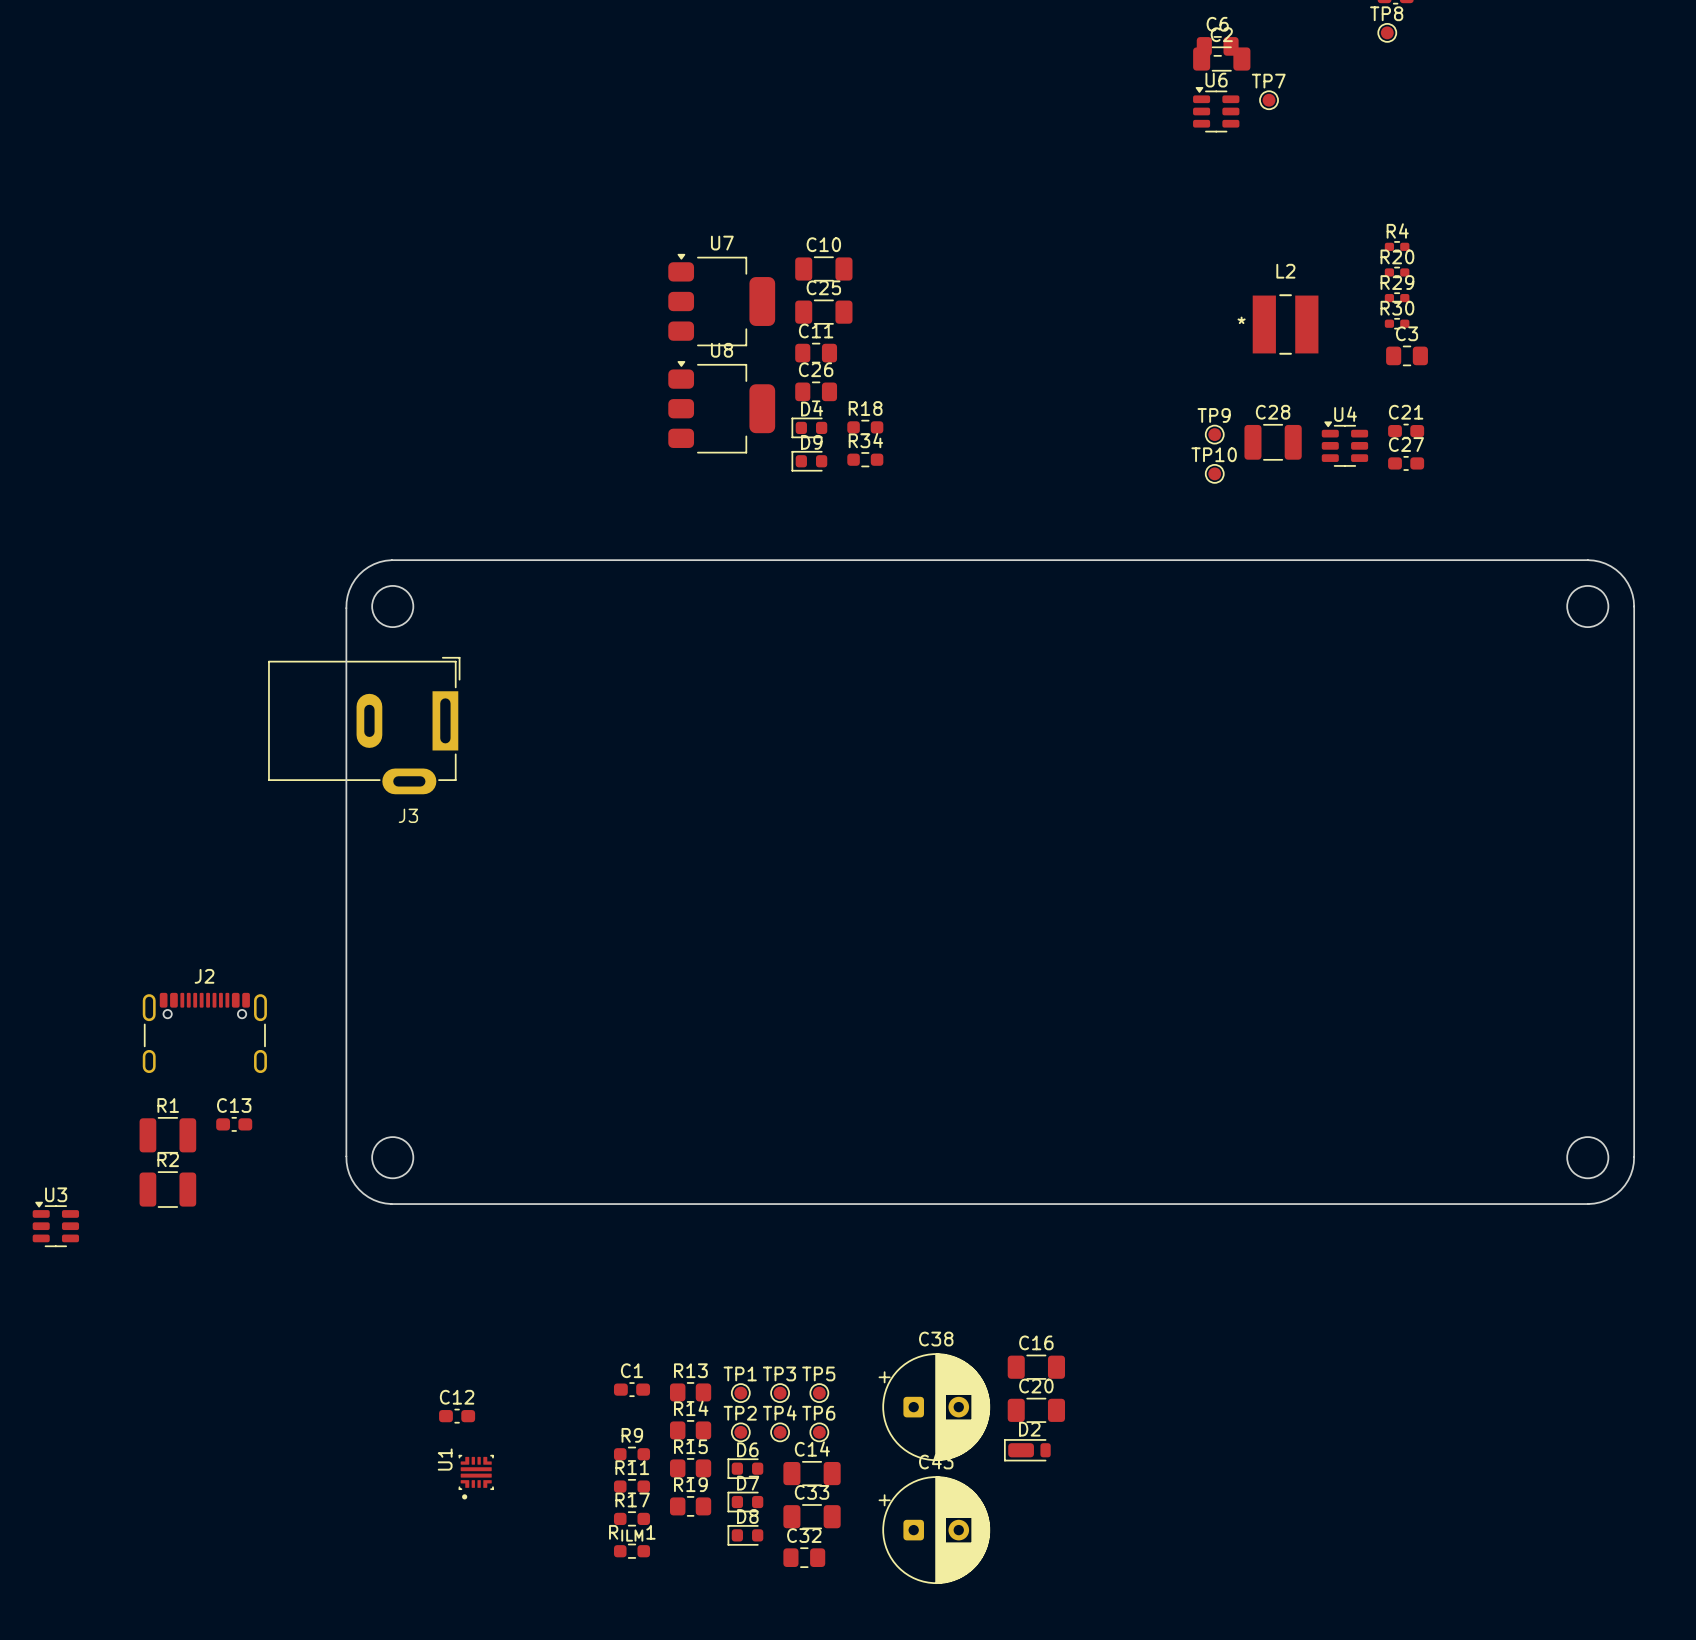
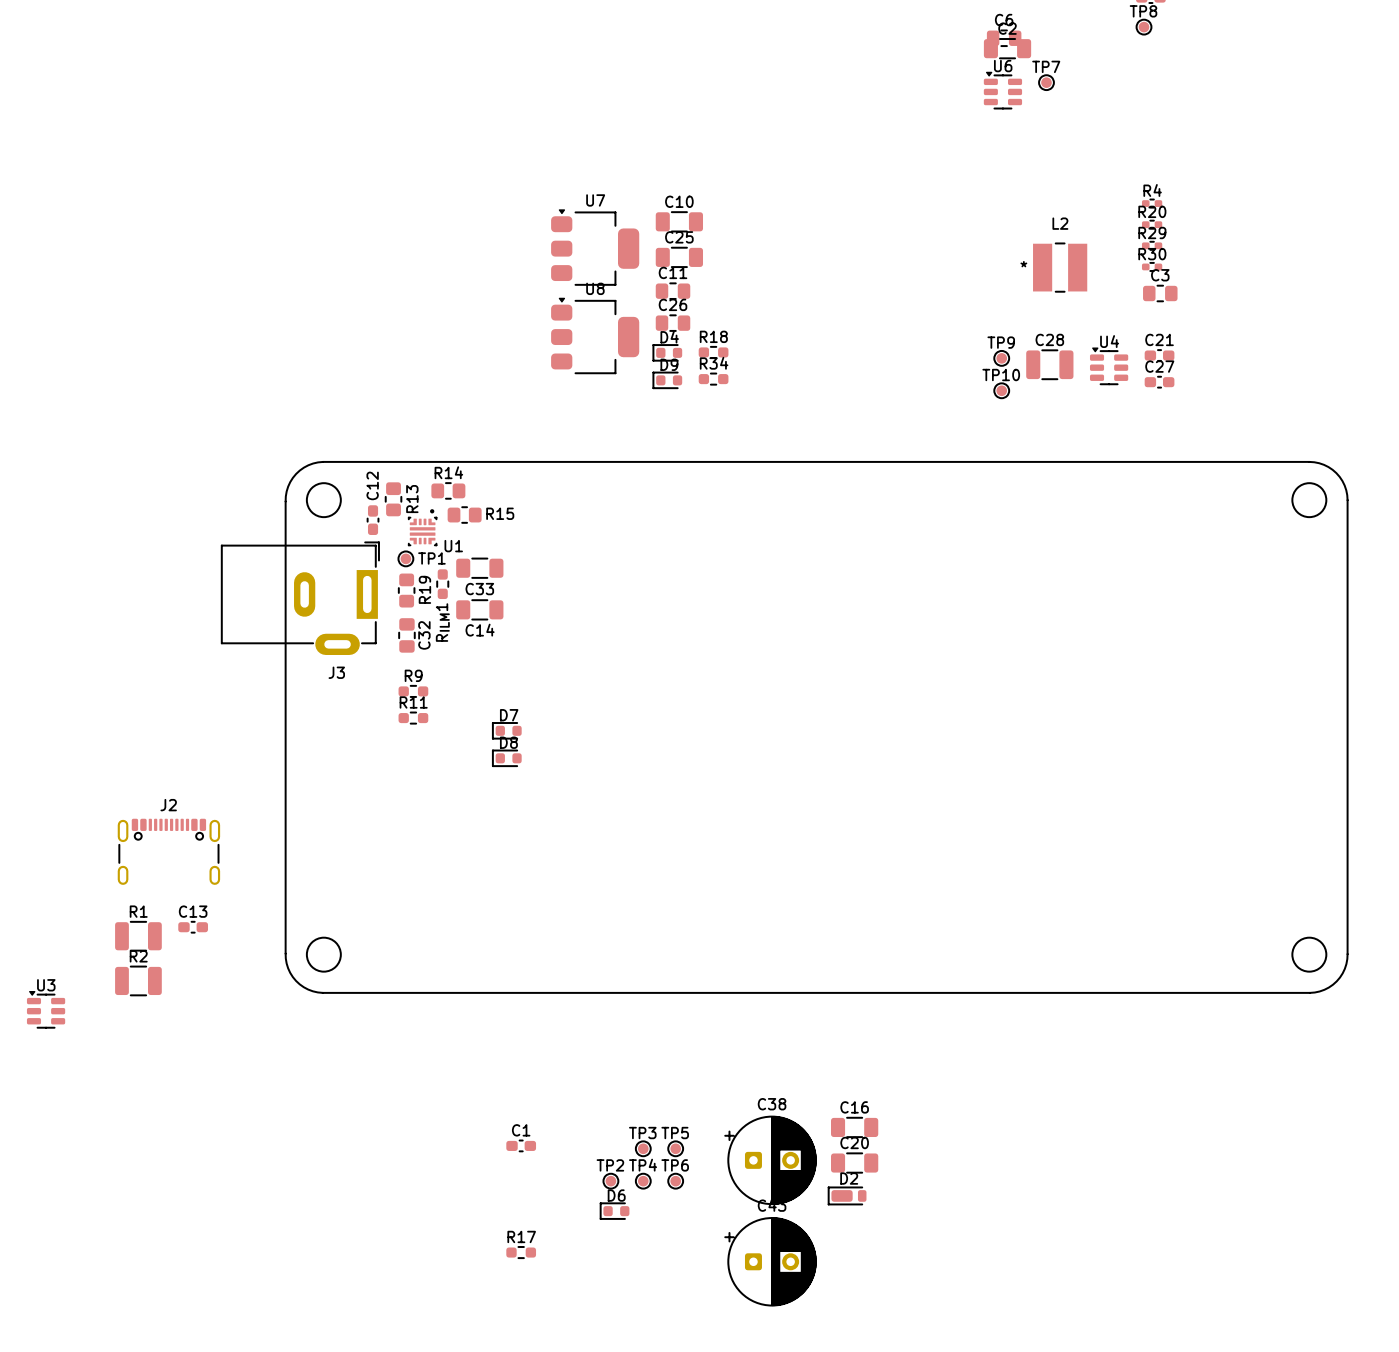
TP1 name position: TP1 (740, 1373) -> TP1 (431, 558)
R13 rotation: 0° (690, 1392) -> 90° clockwise (393, 499)
R13 position: (690, 1392) -> (393, 499)
TP1 position: (740, 1393) -> (405, 558)
C12 rotation: 0° (457, 1416) -> 90° clockwise (373, 520)
C12 position: (457, 1416) -> (373, 520)
R14 position: (690, 1430) -> (448, 490)
R15 name position: R15 (690, 1446) -> R15 (500, 513)
C14 name position: C14 (812, 1448) -> C14 (480, 630)
R9 position: (632, 1454) -> (413, 691)
R15 position: (690, 1468) -> (464, 515)
C14 position: (812, 1473) -> (479, 609)
U1 rotation: 0° (476, 1477) -> 180° (422, 527)
U1 position: (476, 1477) -> (422, 527)
R11 position: (632, 1486) -> (413, 718)
C33 name position: C33 (812, 1492) -> C33 (479, 589)
D7 position: (745, 1502) -> (506, 730)
R19 rotation: 0° (690, 1506) -> 90° clockwise (406, 590)
R19 position: (690, 1506) -> (406, 590)
C33 position: (812, 1516) -> (479, 568)
RILM1 name position: RILM1 (632, 1533) -> RILM1 (442, 622)
D8 position: (745, 1535) -> (506, 758)
RILM1 rotation: 0° (632, 1551) -> 90° clockwise (442, 584)
RILM1 position: (632, 1551) -> (442, 584)
C32 rotation: 0° (804, 1557) -> 90° clockwise (406, 635)
C32 position: (804, 1557) -> (406, 635)

